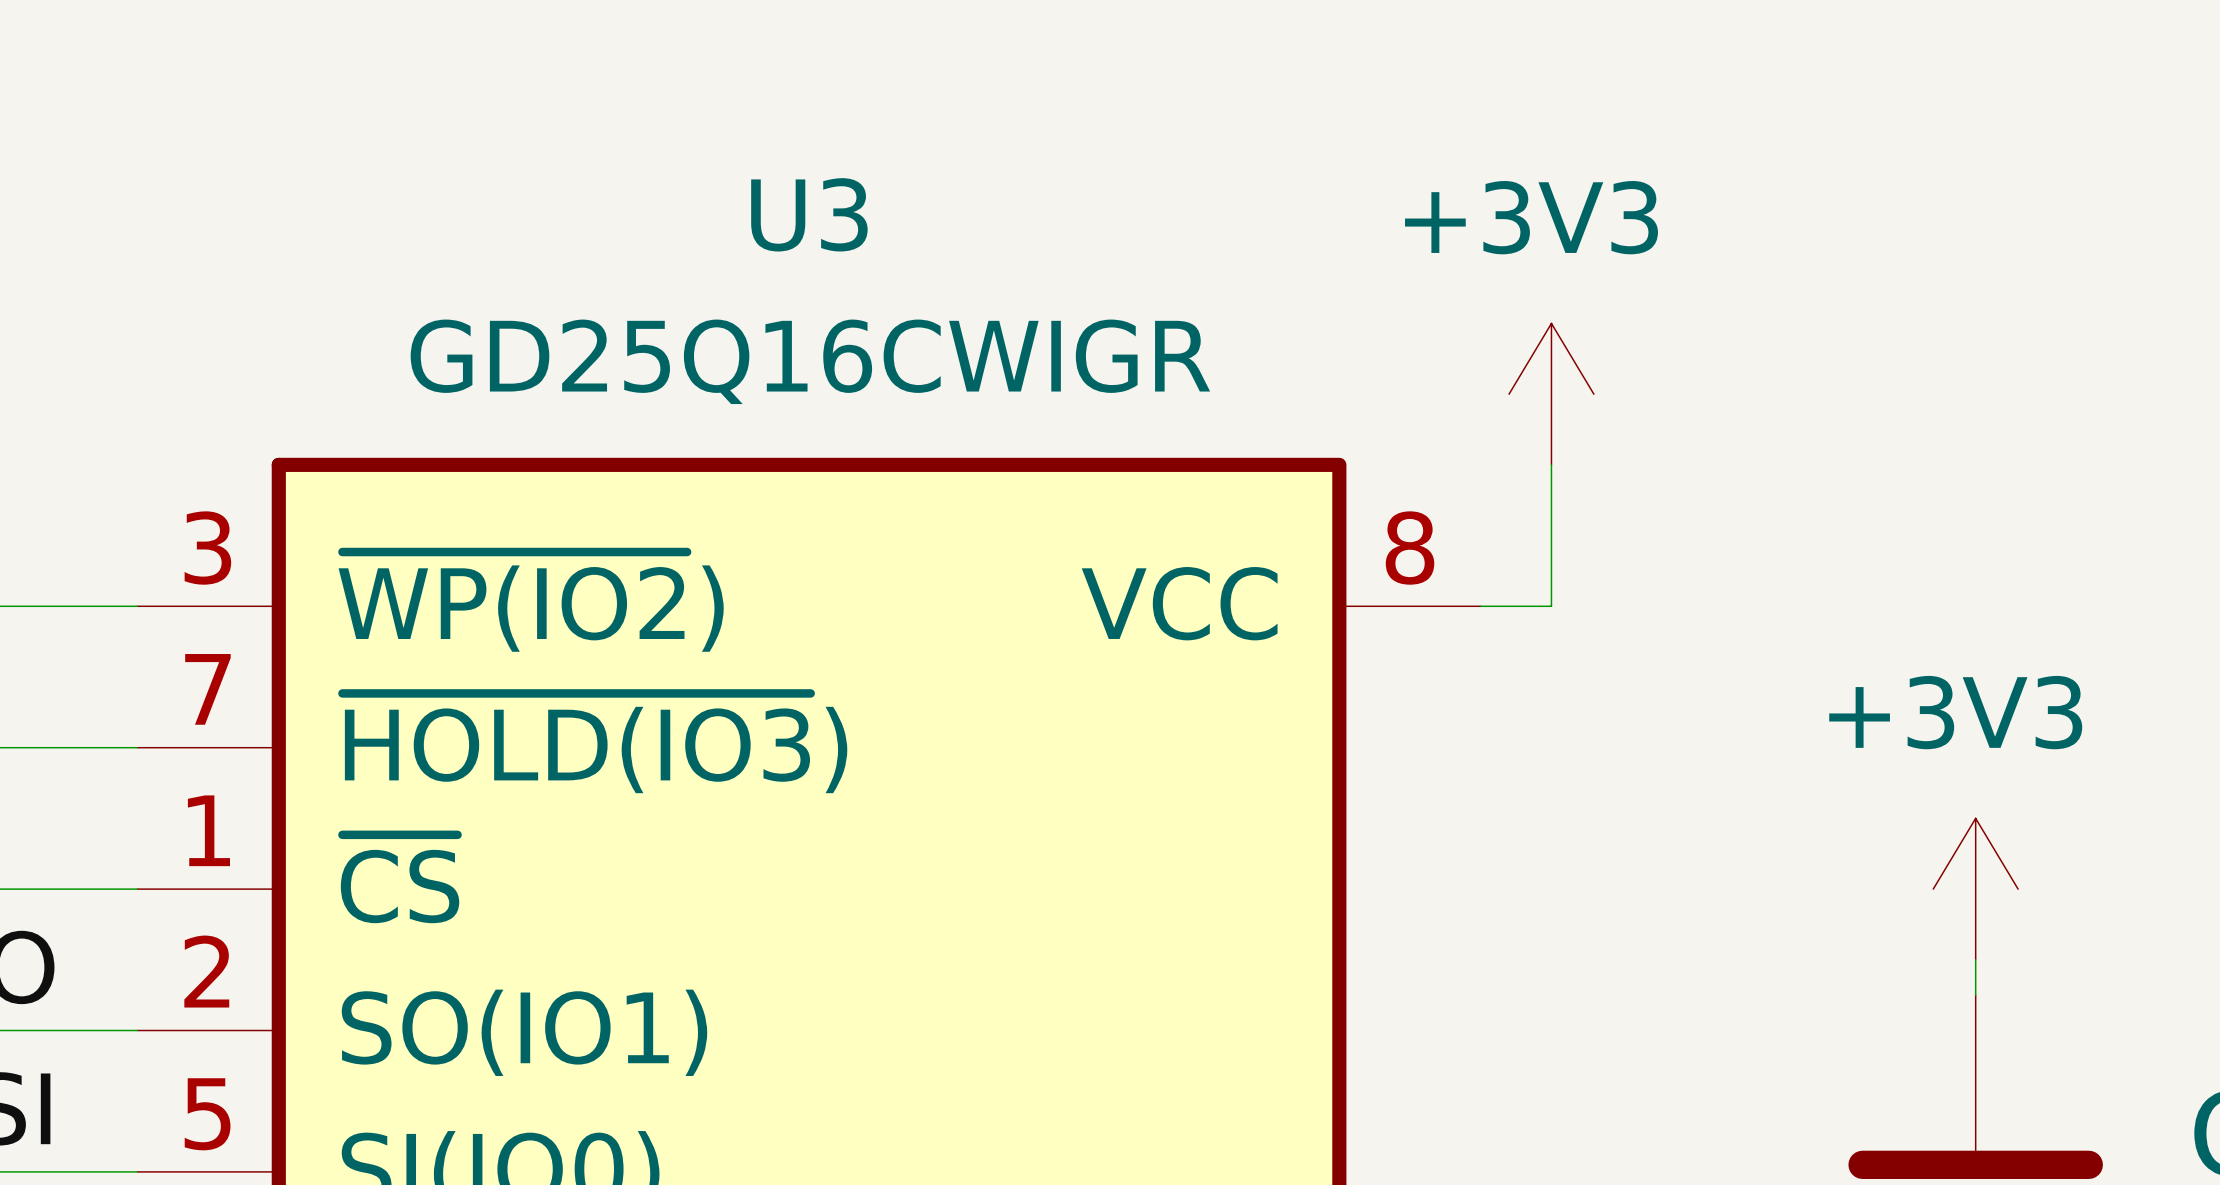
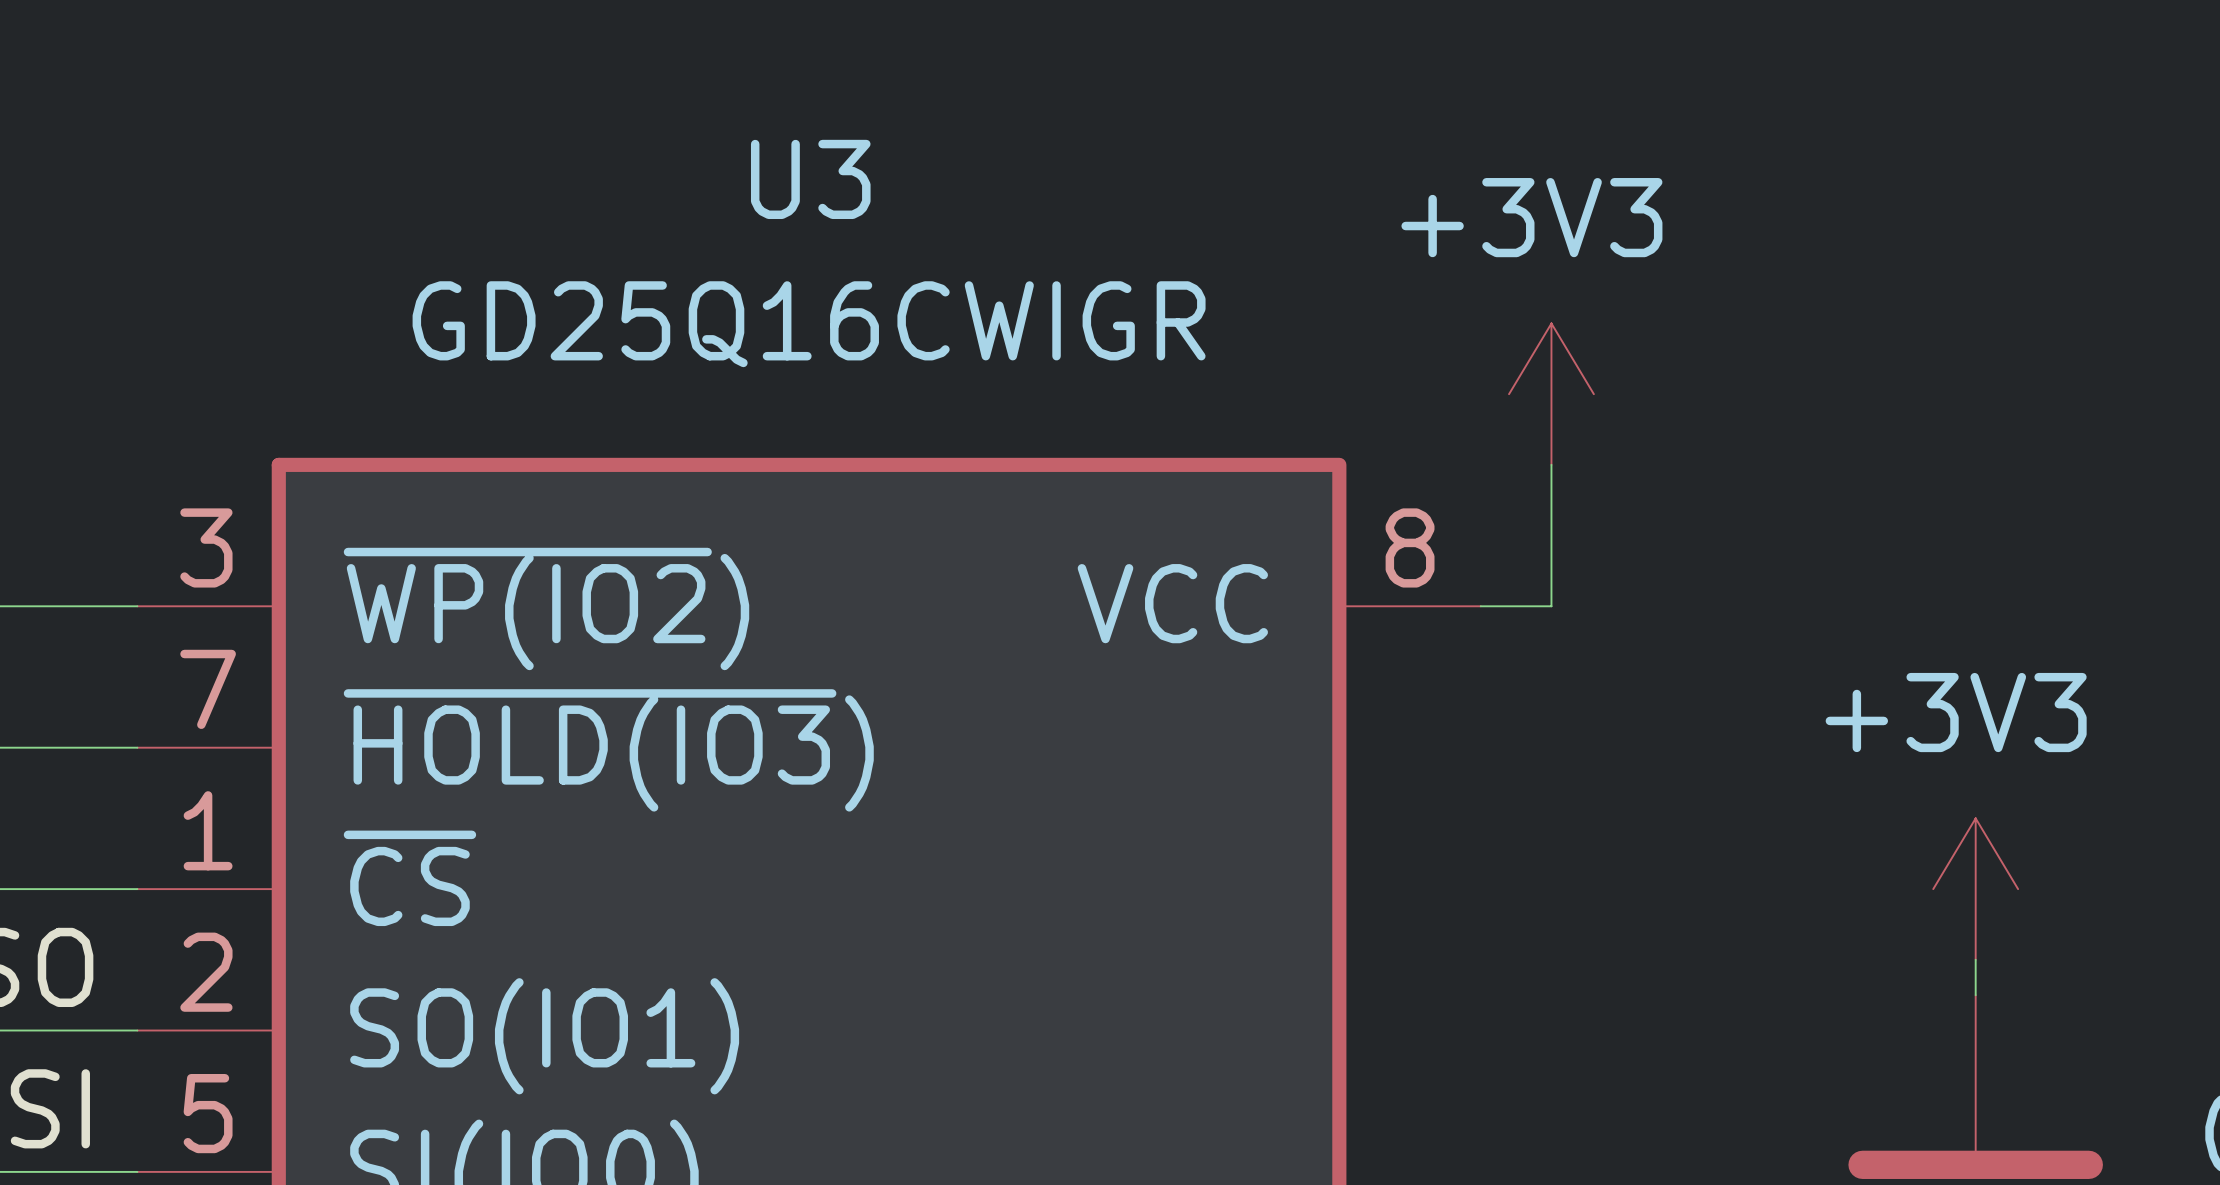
U3 name position: U3 (809, 214) -> U3 (810, 179)
U3 text: none -> GD25Q16CWIGR (809, 324)
U3 value: GD25Q16CWIGR (810, 361) -> none

